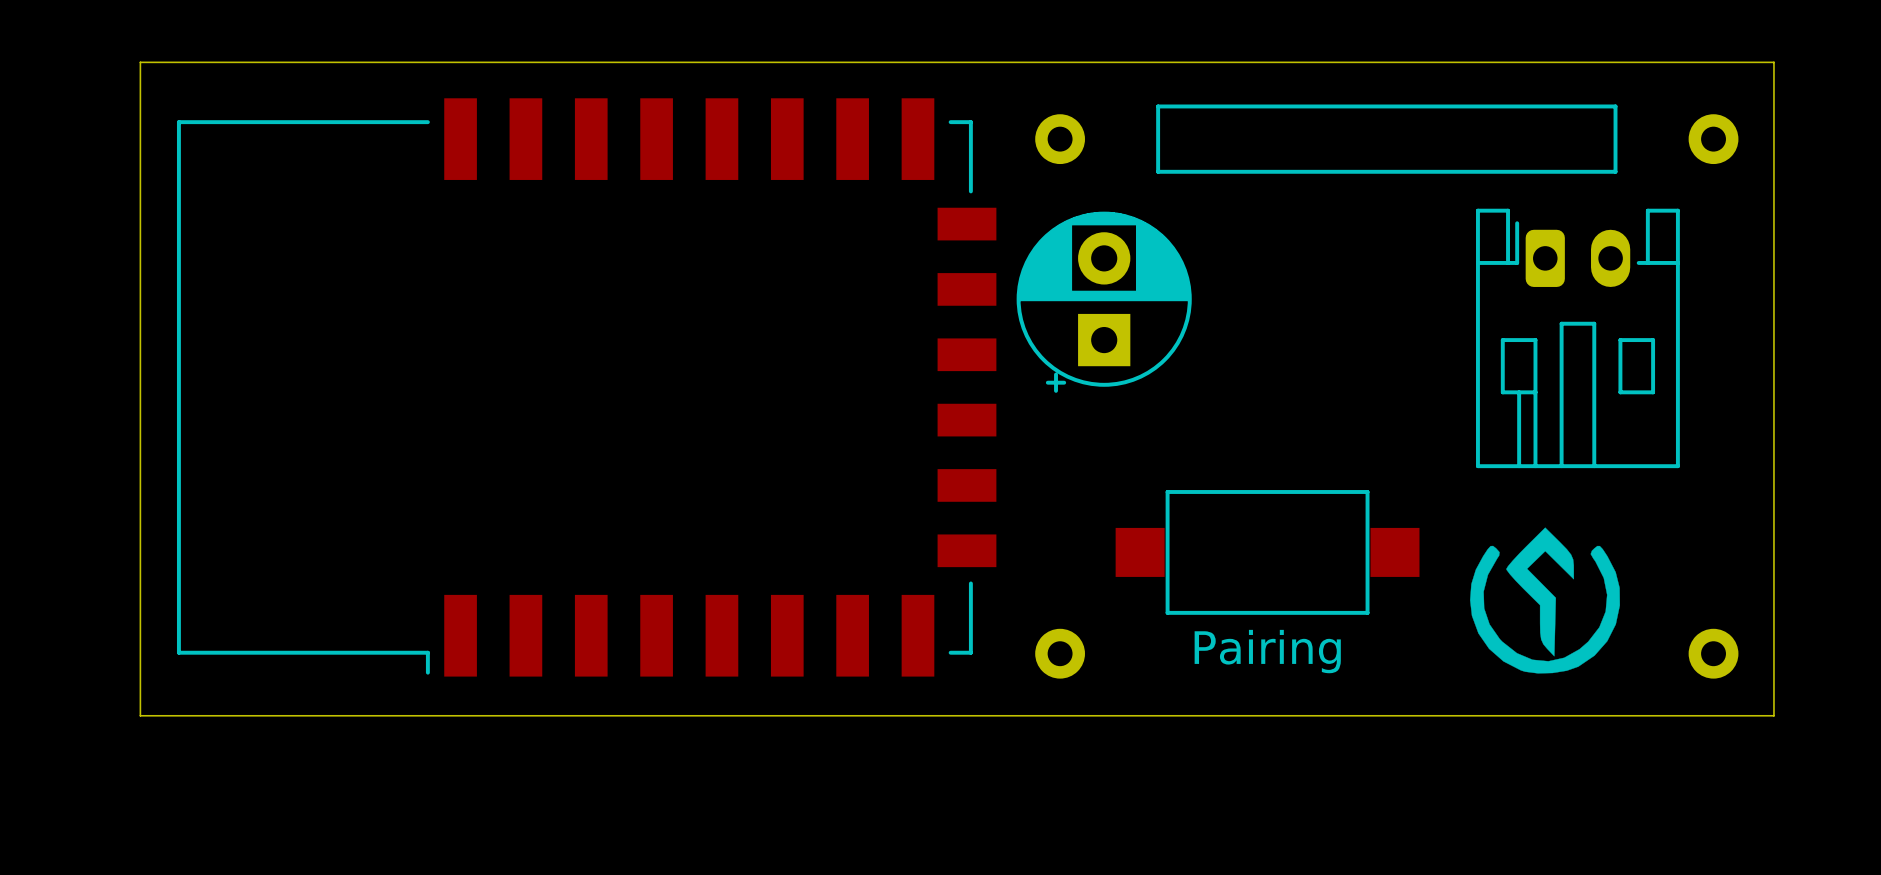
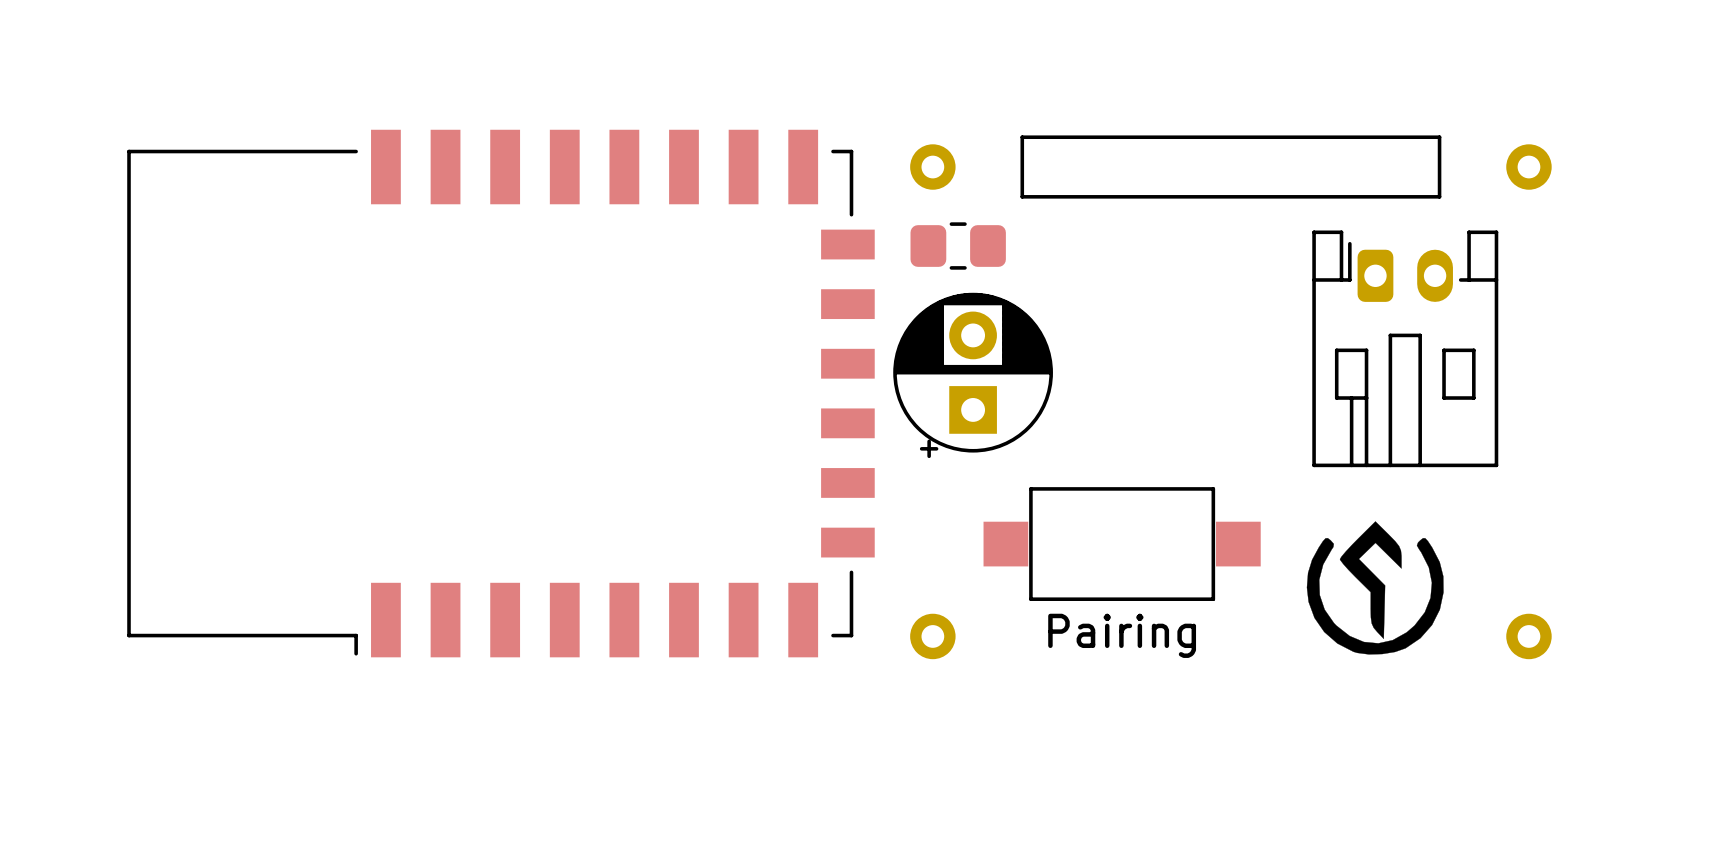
board edge: (140, 62) (140, 715) (1773, 715) (1773, 62) (140, 62) -> none
part: none -> (958, 246)
part position: (1104, 302) -> (973, 375)

